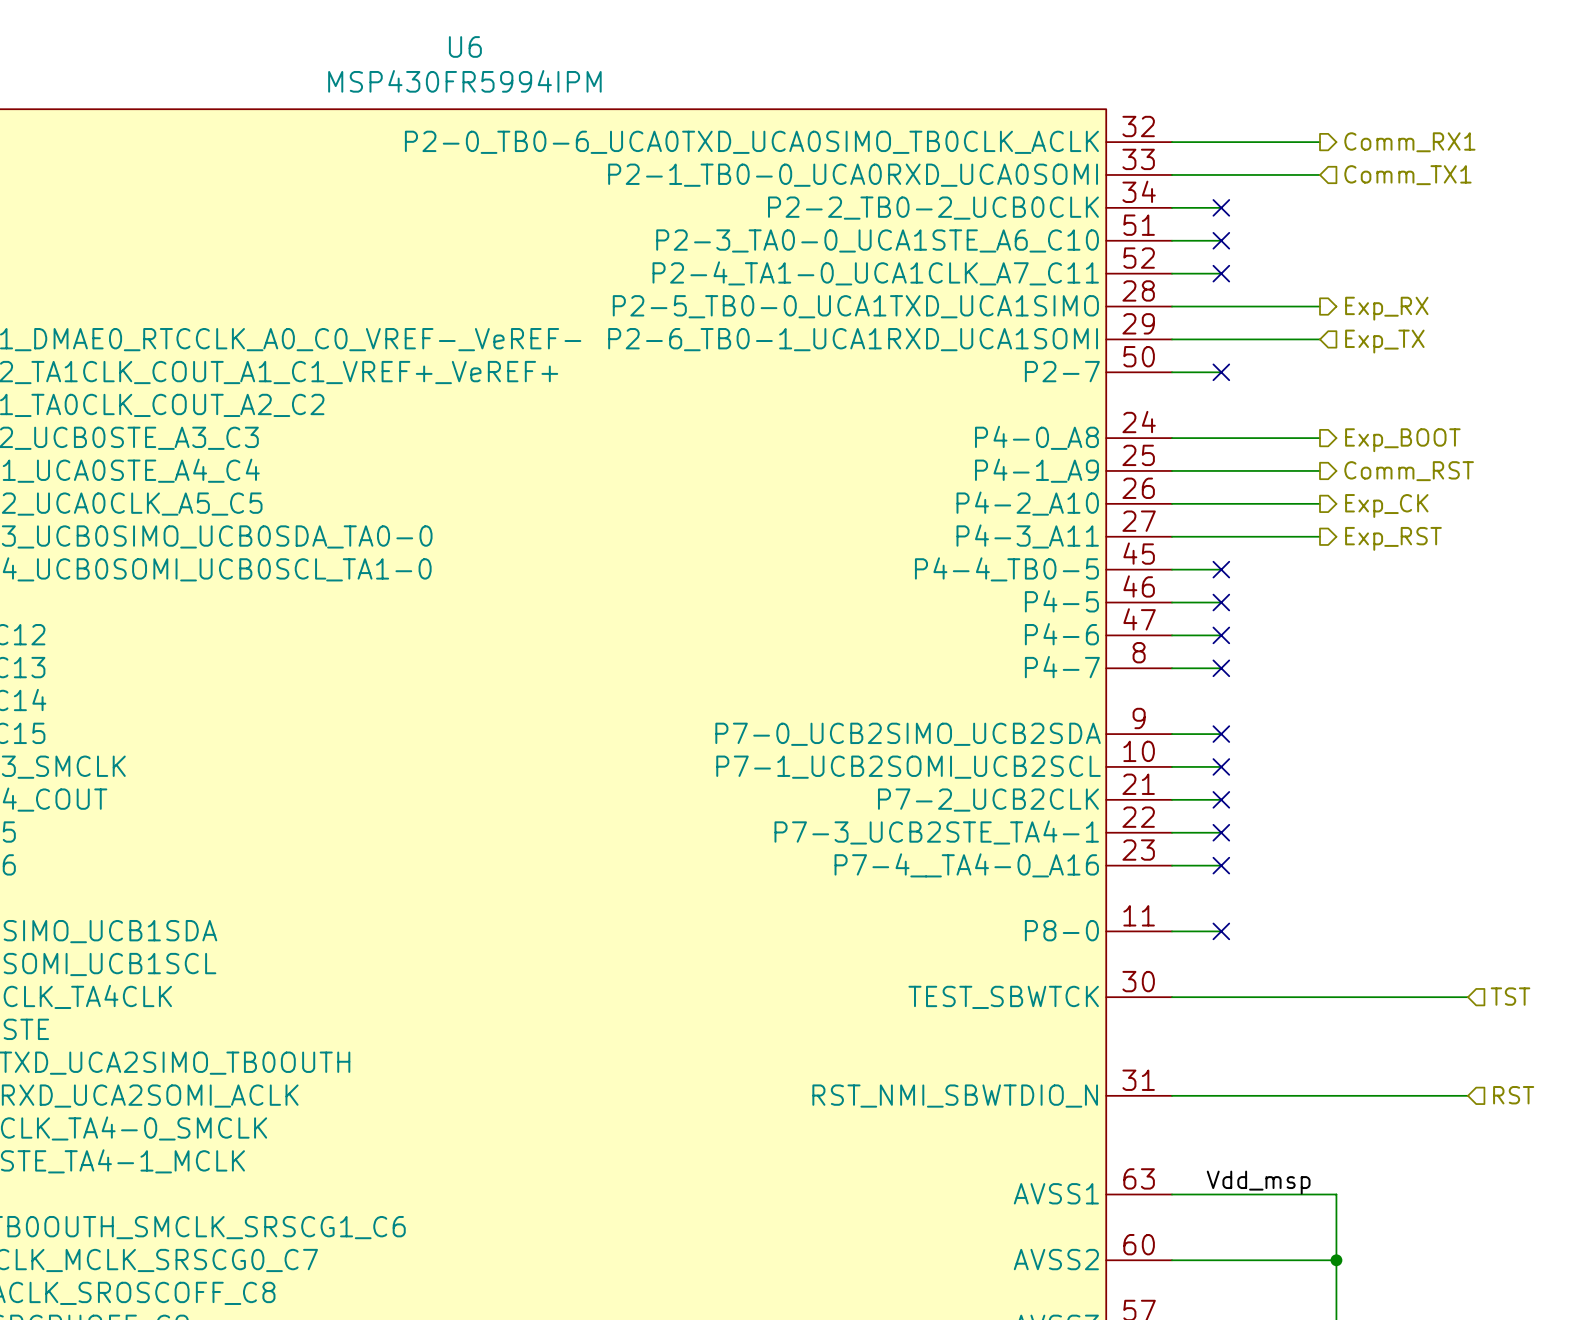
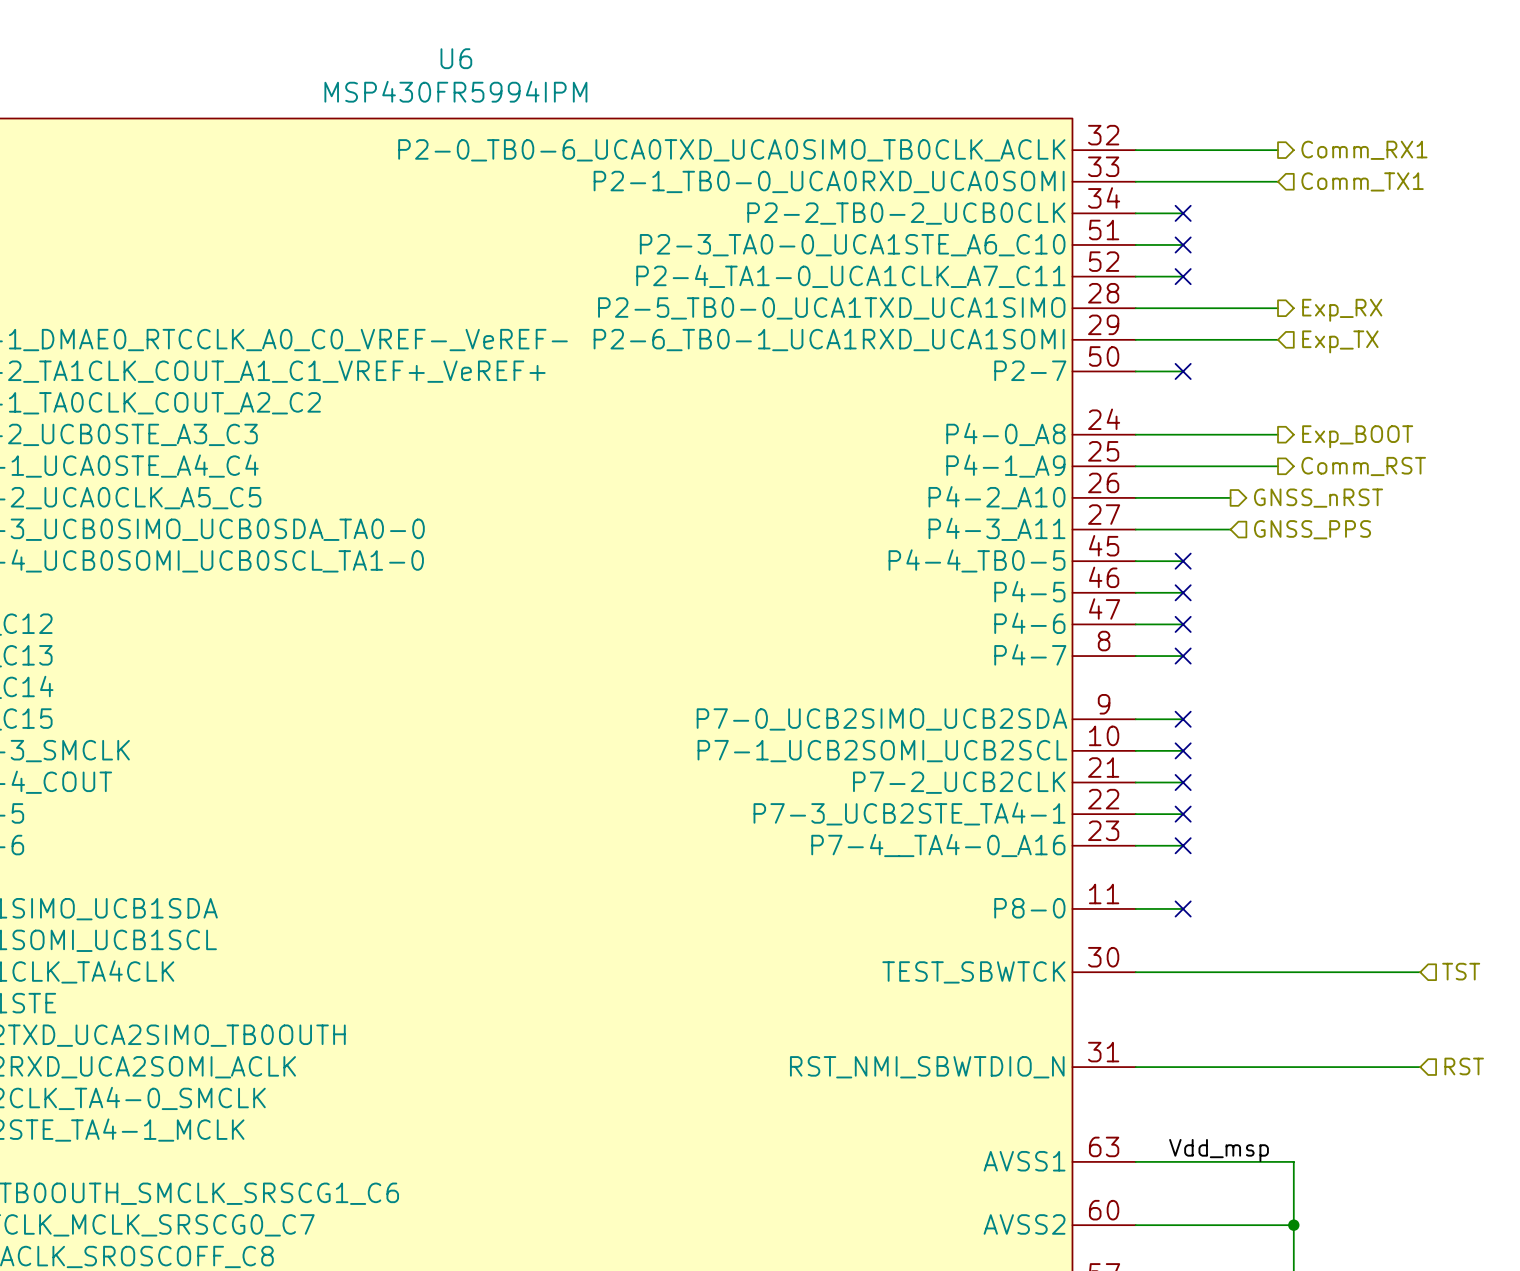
wire: (1270, 503) (1319, 503) -> none
hierarchical label: none -> GNSS_nRST (1318, 498)
hierarchical label: Exp_CK (1386, 505) -> none
wire: (1270, 536) (1319, 536) -> none
hierarchical label: none -> GNSS_PPS (1312, 529)
hierarchical label: Exp_RST (1393, 538) -> none

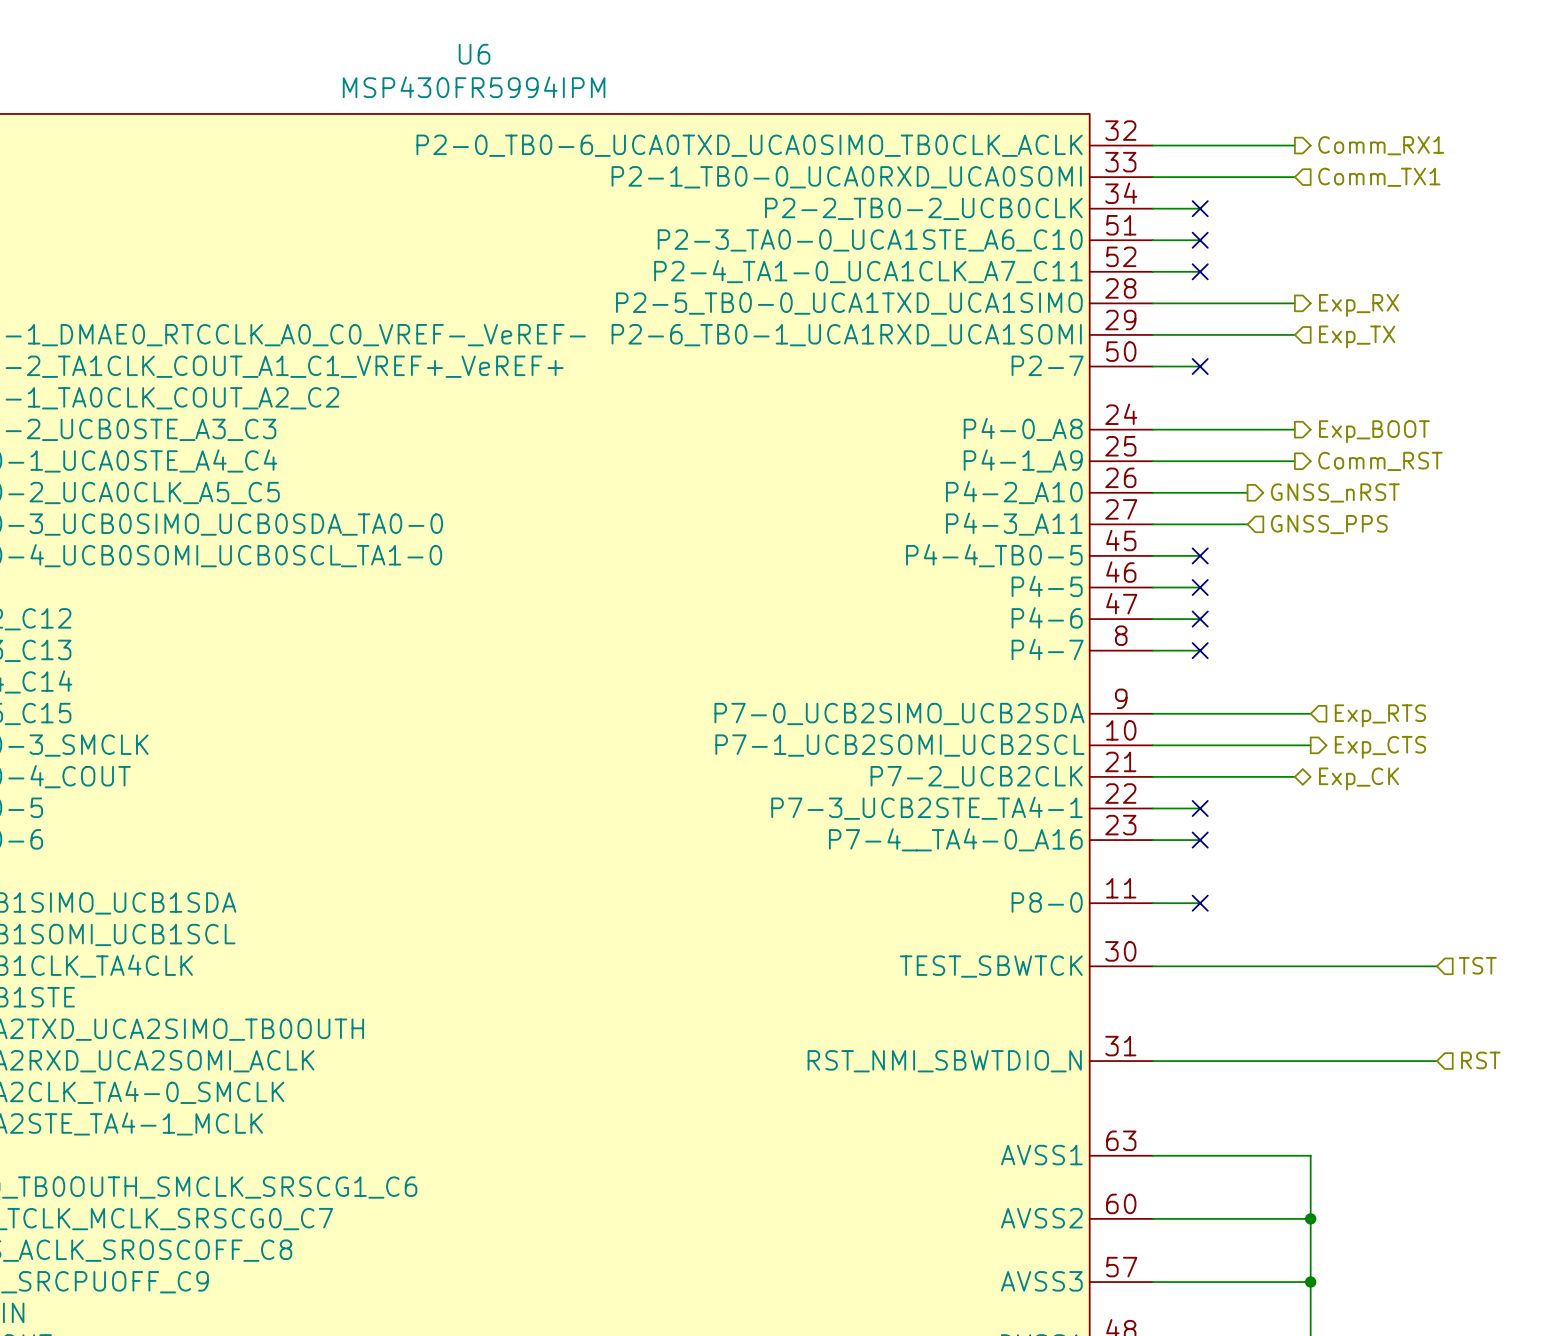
wire: none -> (1200, 713) (1310, 713)
no-connect mark: (1183, 719) -> none
hierarchical label: none -> Exp_RTS (1380, 715)
wire: none -> (1200, 745) (1310, 745)
no-connect mark: (1183, 750) -> none
hierarchical label: none -> Exp_CTS (1380, 747)
wire: none -> (1200, 776) (1294, 776)
no-connect mark: (1183, 782) -> none
hierarchical label: none -> Exp_CK (1359, 778)
label: Vdd_msp (1219, 1150) -> none

